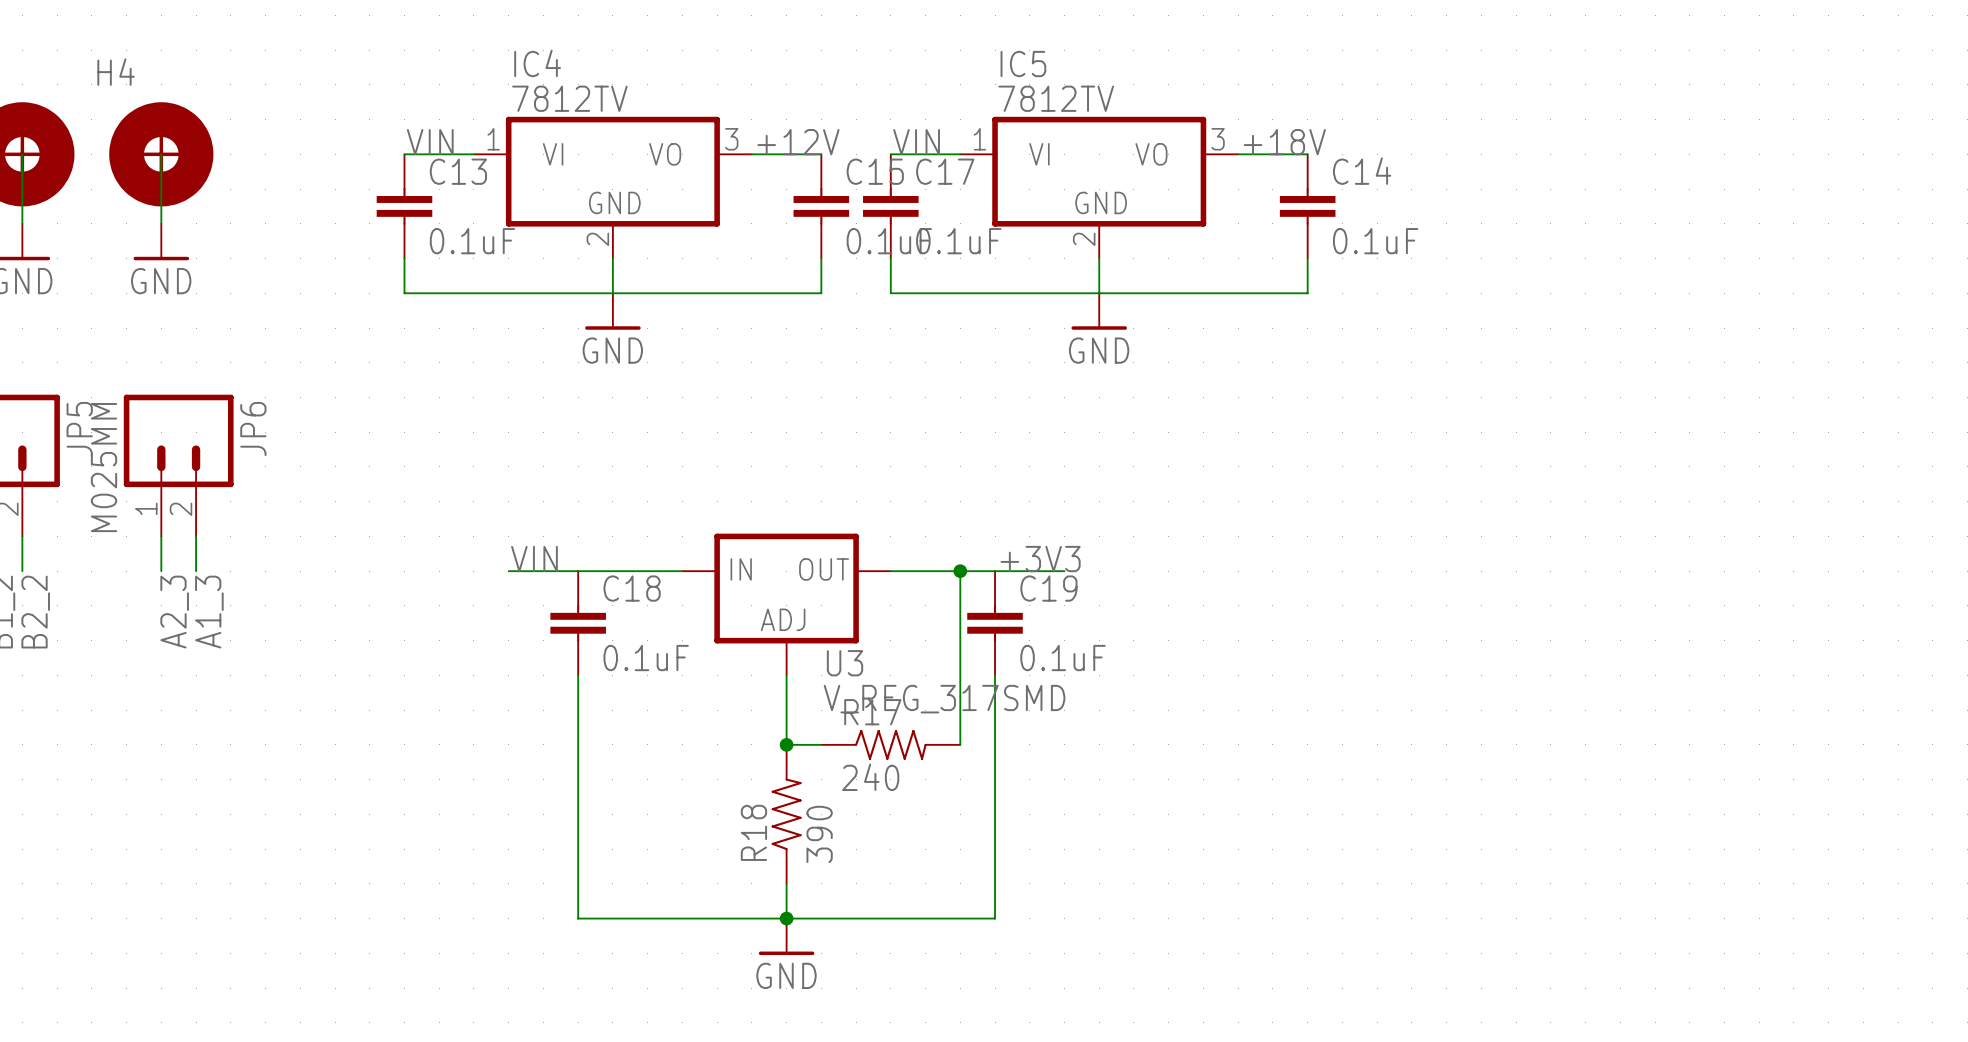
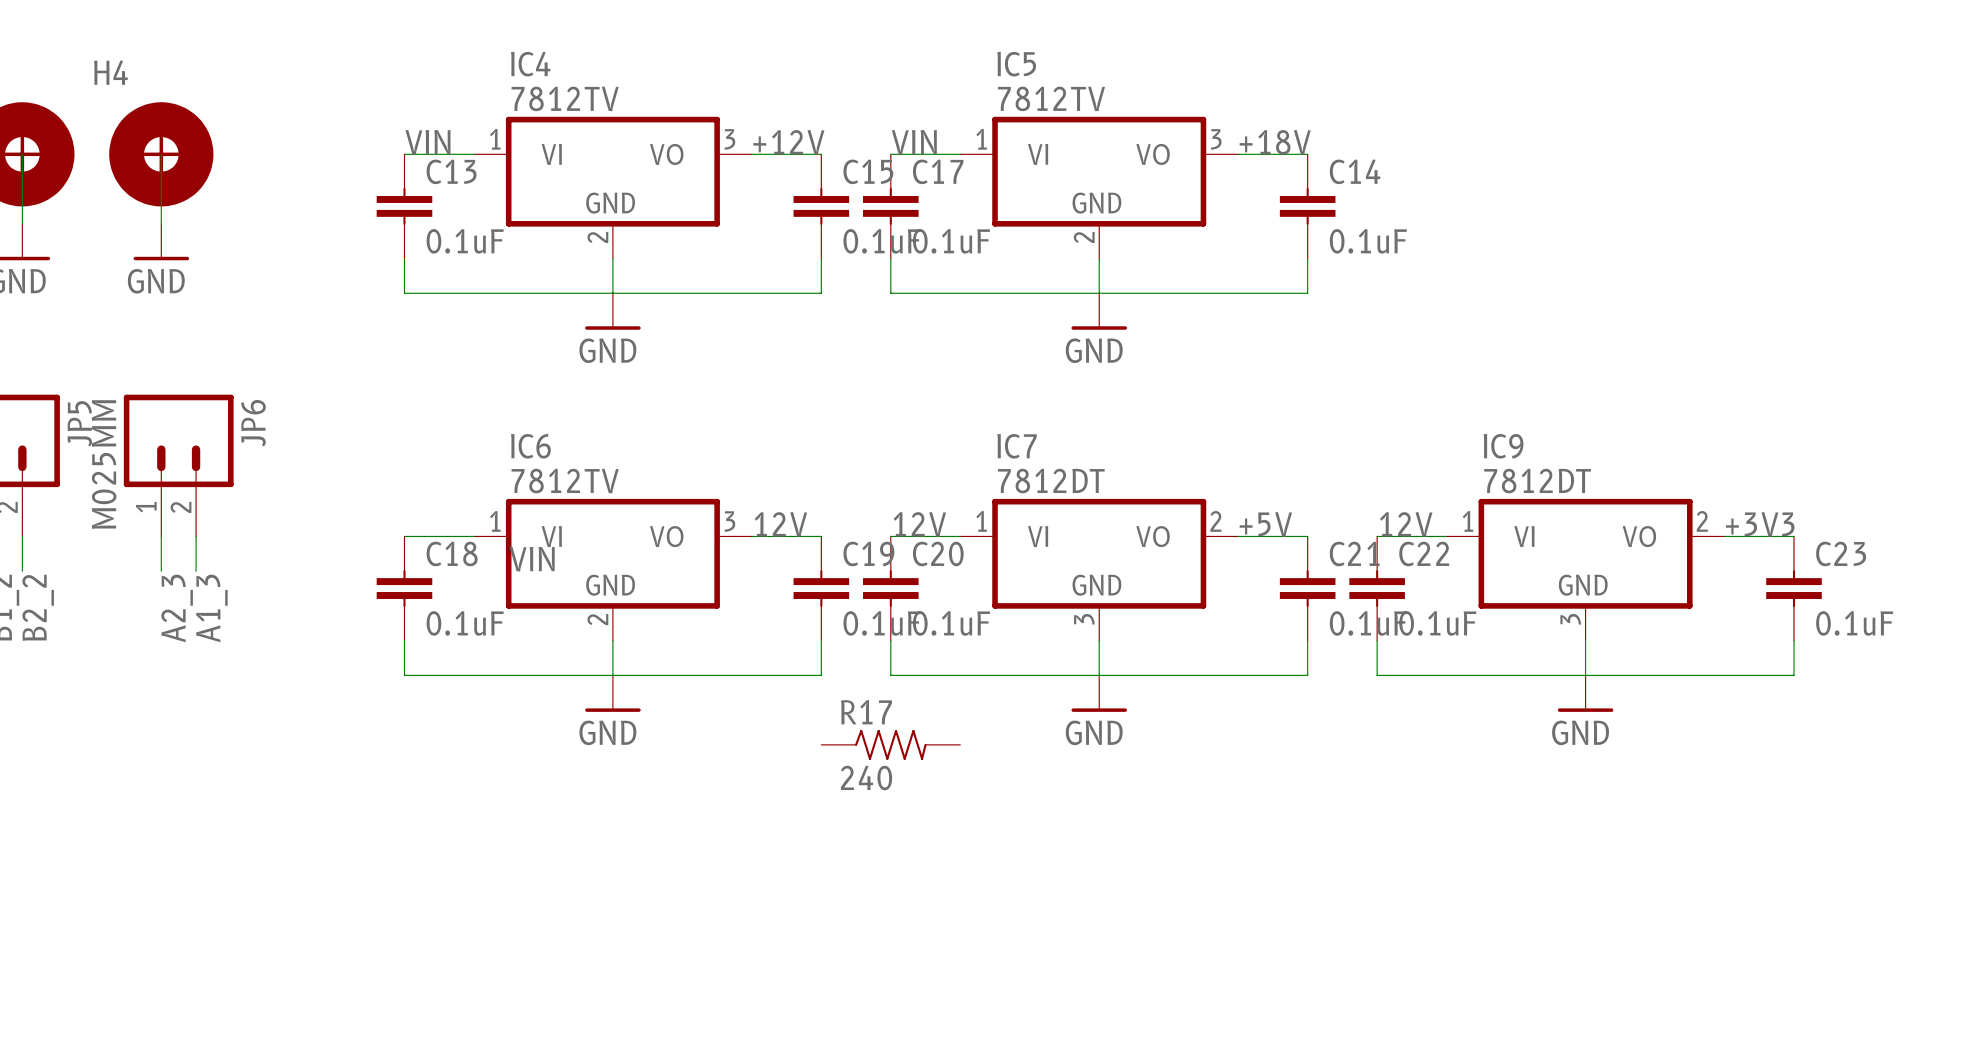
label: none -> 12V (780, 524)
label: none -> 12V (919, 524)
label: none -> +5V (1265, 524)
label: none -> 12V (1406, 524)
label: none -> +3V3 (1760, 524)
wire: none -> (404, 536) (473, 536)
wire: none -> (890, 536) (960, 536)
wire: none -> (1238, 536) (1307, 536)
wire: none -> (1377, 536) (1446, 536)
wire: none -> (1724, 536) (1793, 536)
label: +3V3 (1040, 559) -> none
IC6: none -> 7812TV (612, 569)
IC7: none -> 7812DT (1099, 569)
IC9: none -> 7812DT (1585, 569)
wire: (508, 571) (682, 571) -> none
wire: (890, 571) (1064, 571) -> none
wire: (960, 571) (960, 744) -> none
junction: (960, 571) -> none
C20: none -> 0.1uF (890, 588)
C21: none -> 0.1uF (1307, 588)
C22: none -> 0.1uF (1377, 588)
C23: none -> 0.1uF (1793, 588)
U3: V_REG_317SMD (786, 604) -> none
C18 position: (578, 623) -> (404, 588)
C19 position: (995, 623) -> (821, 588)
wire: none -> (404, 640) (404, 675) (821, 675) (821, 640)
wire: none -> (890, 640) (890, 675) (1307, 675) (1307, 640)
wire: none -> (1099, 640) (1099, 675)
wire: none -> (1377, 640) (1377, 675) (1793, 675) (1793, 640)
wire: none -> (1585, 640) (1585, 675)
wire: (578, 675) (578, 918) (995, 918) (995, 675) -> none
wire: (786, 675) (786, 744) (821, 744) -> none
power symbol: none -> GND (612, 693)
power symbol: none -> GND (1099, 693)
power symbol: none -> GND (1585, 693)
junction: (786, 744) -> none
R18: 390 (786, 814) -> none
wire: (786, 883) (786, 918) -> (612, 640) (612, 675)
junction: (786, 918) -> none
power symbol: GND (786, 936) -> none

